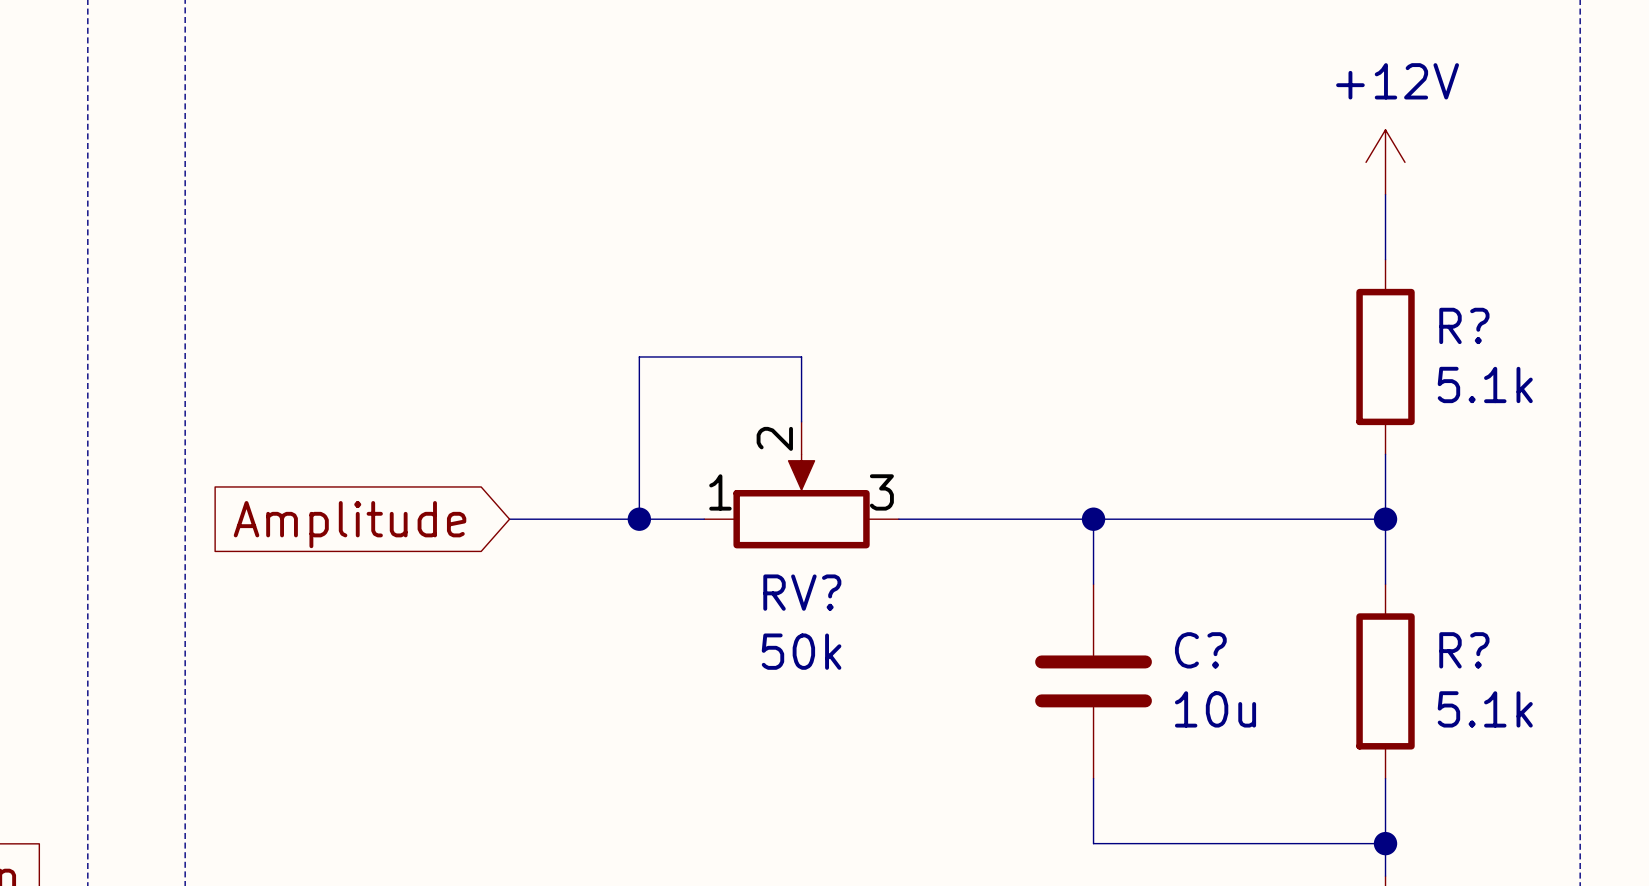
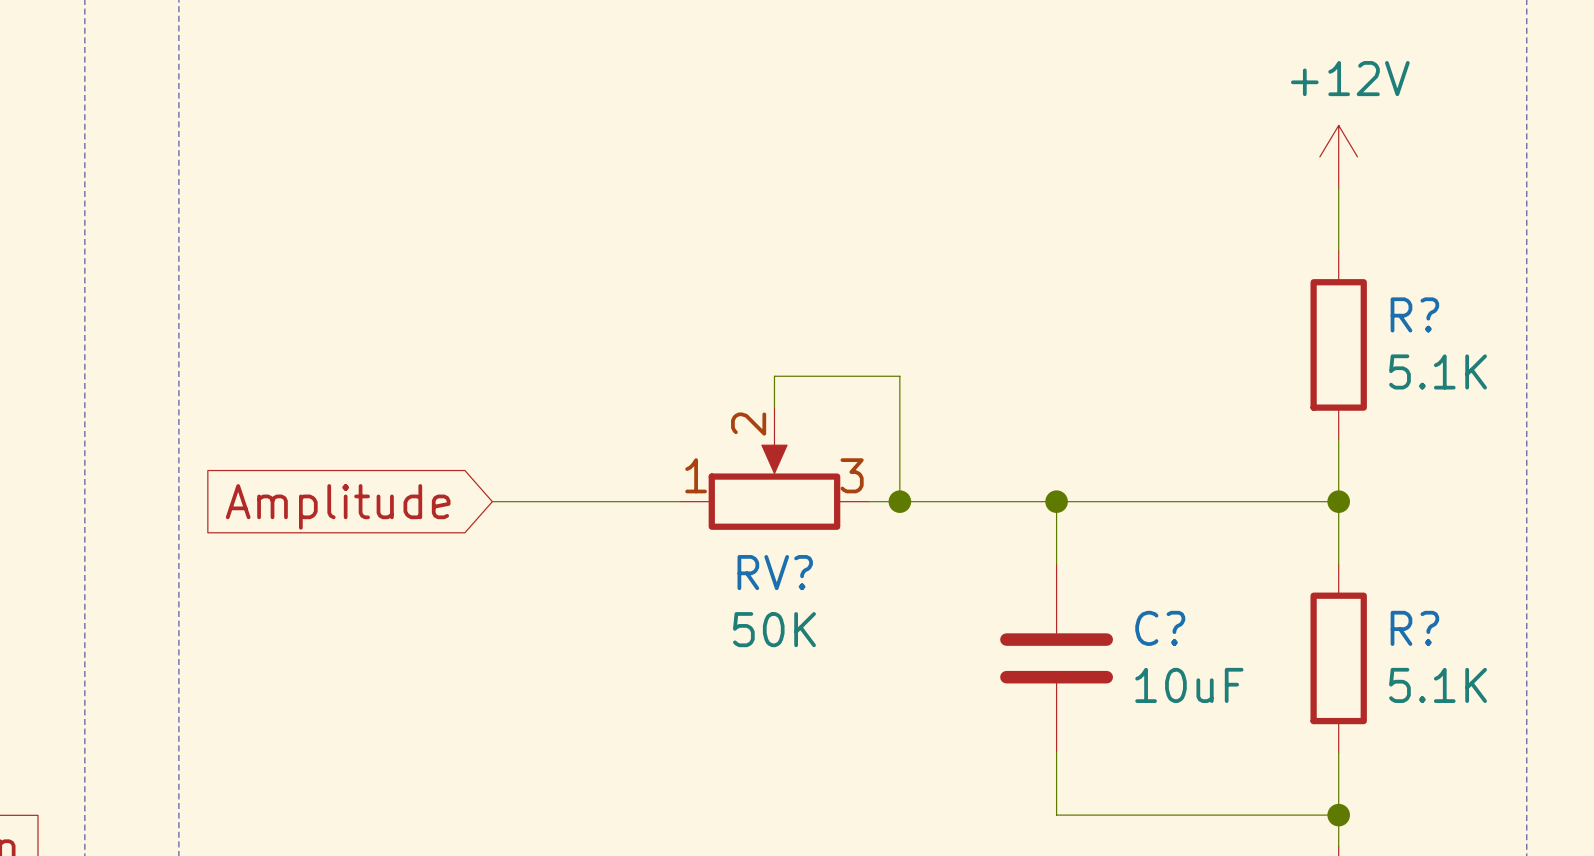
R? value: 5.1k (1485, 384) -> 5.1K (1438, 371)
wire: (801, 389) (801, 356) (639, 356) (639, 519) -> (774, 376) (899, 376) (899, 501)
junction: (639, 519) -> none
junction: none -> (899, 501)
RV? value: 50k (801, 651) -> 50K (774, 629)
C? value: 10u (1215, 709) -> 10uF (1189, 685)
R? value: 5.1k (1485, 709) -> 5.1K (1438, 685)

